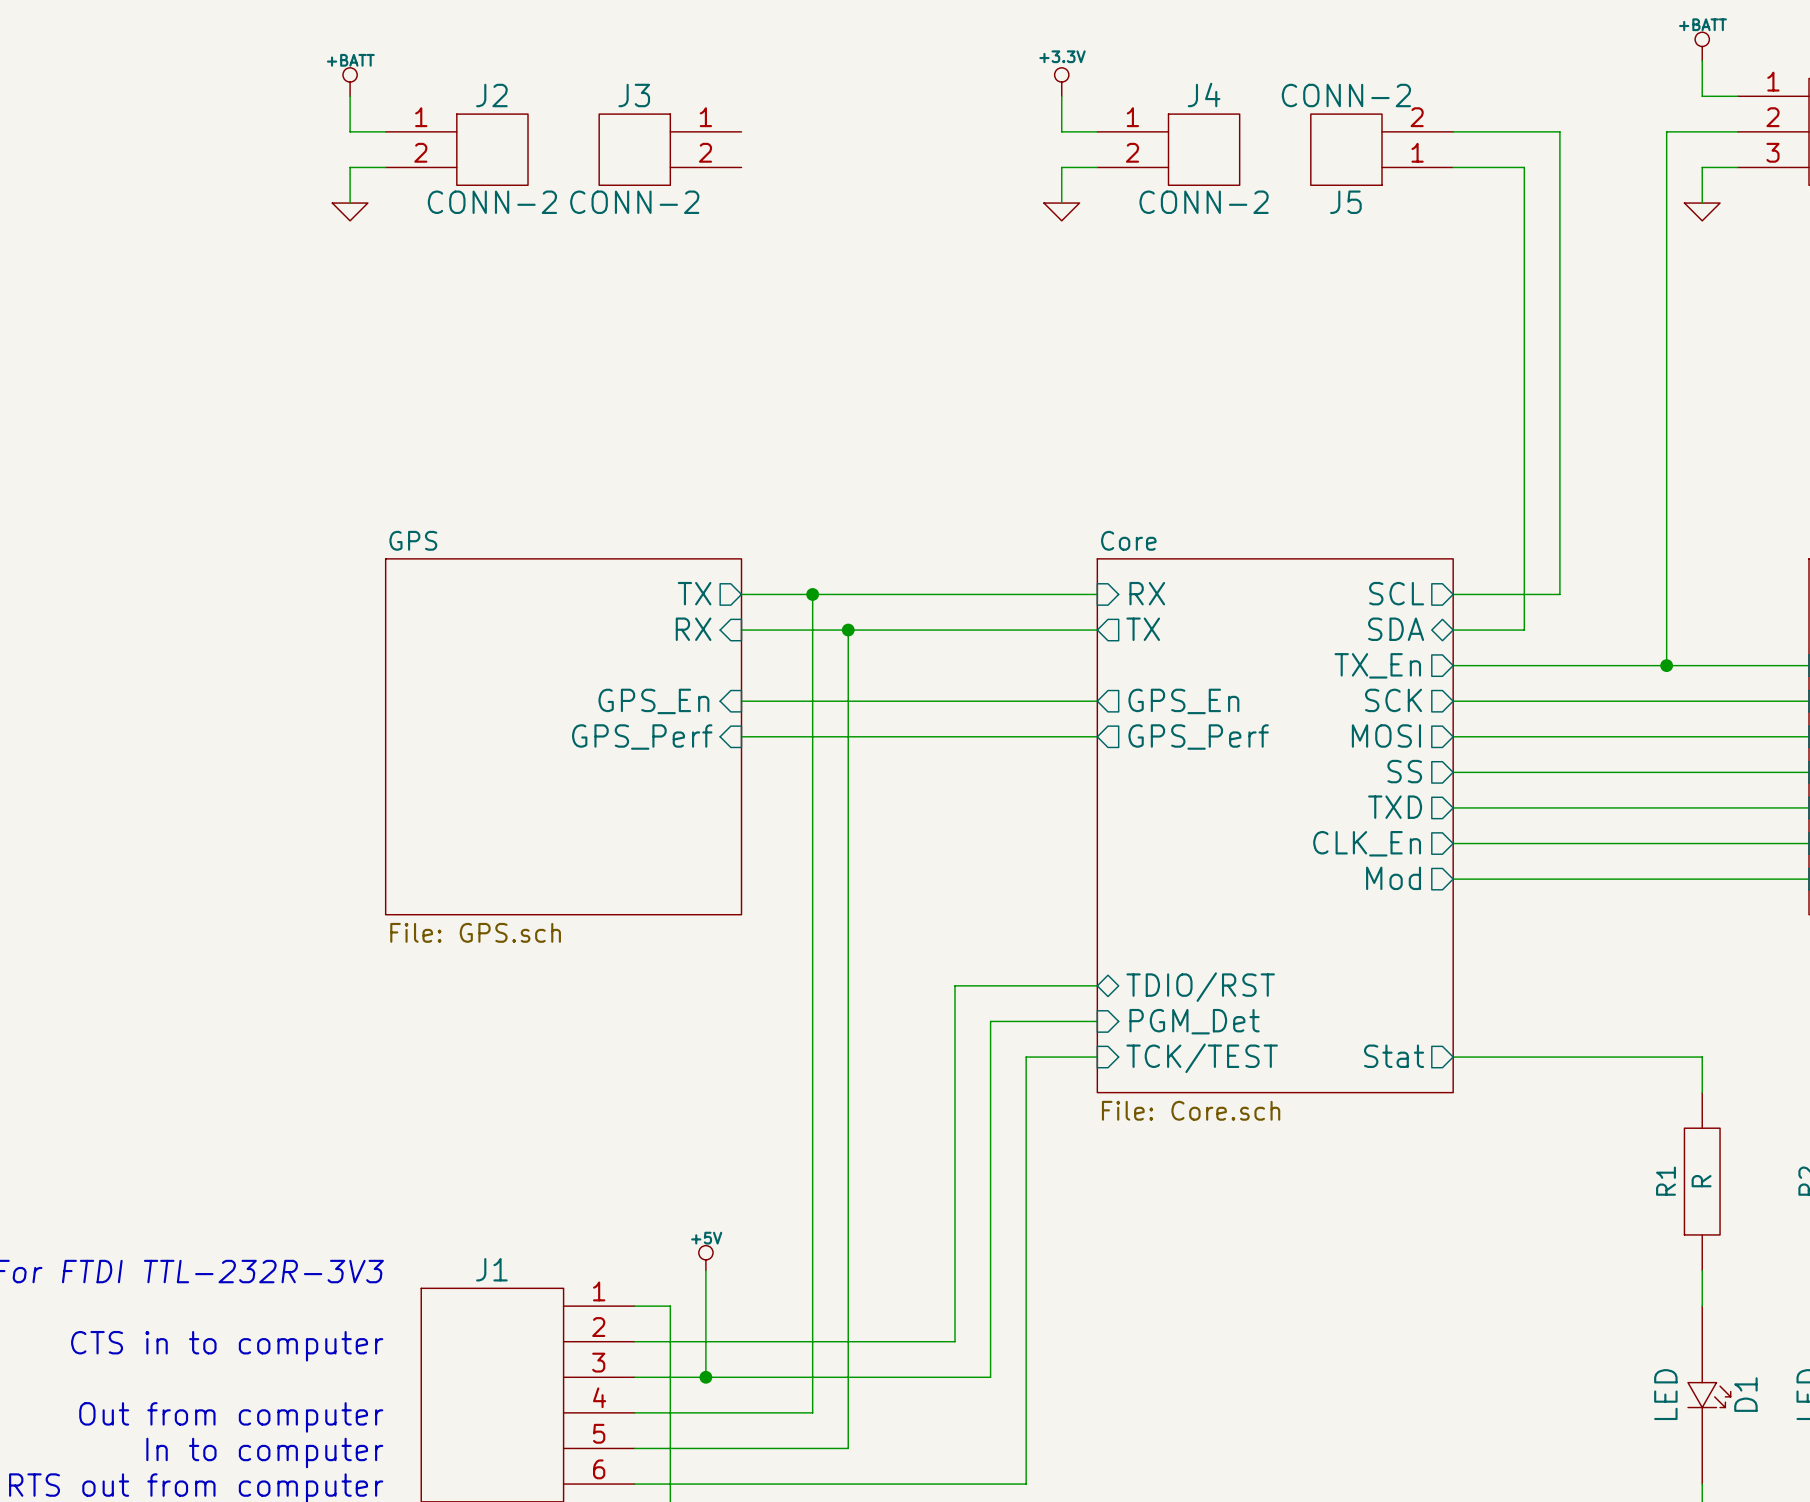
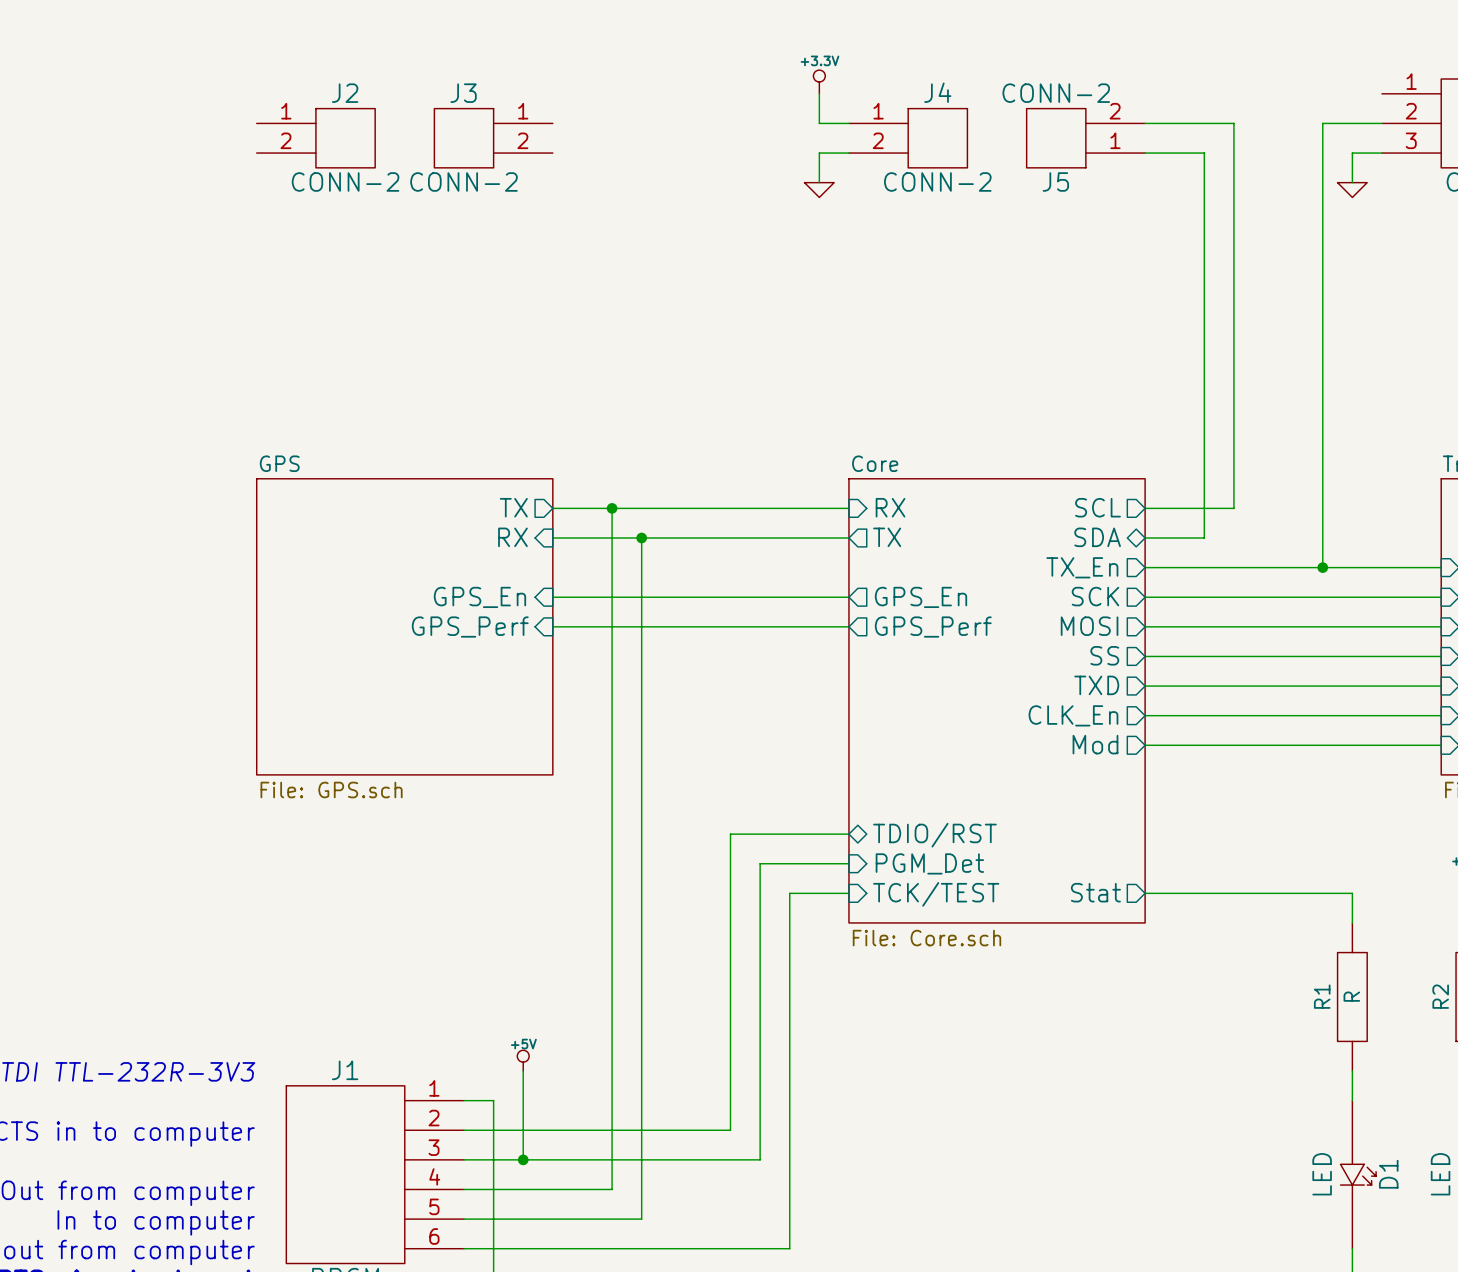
power symbol: +BATT (1702, 46) -> none
wire: (1702, 60) (1702, 96) (1737, 96) -> none
power symbol: +BATT (350, 82) -> none
wire: (350, 96) (350, 131) (385, 131) -> none
wire: (385, 167) (350, 167) (350, 203) -> none
power symbol: (350, 211) -> none

